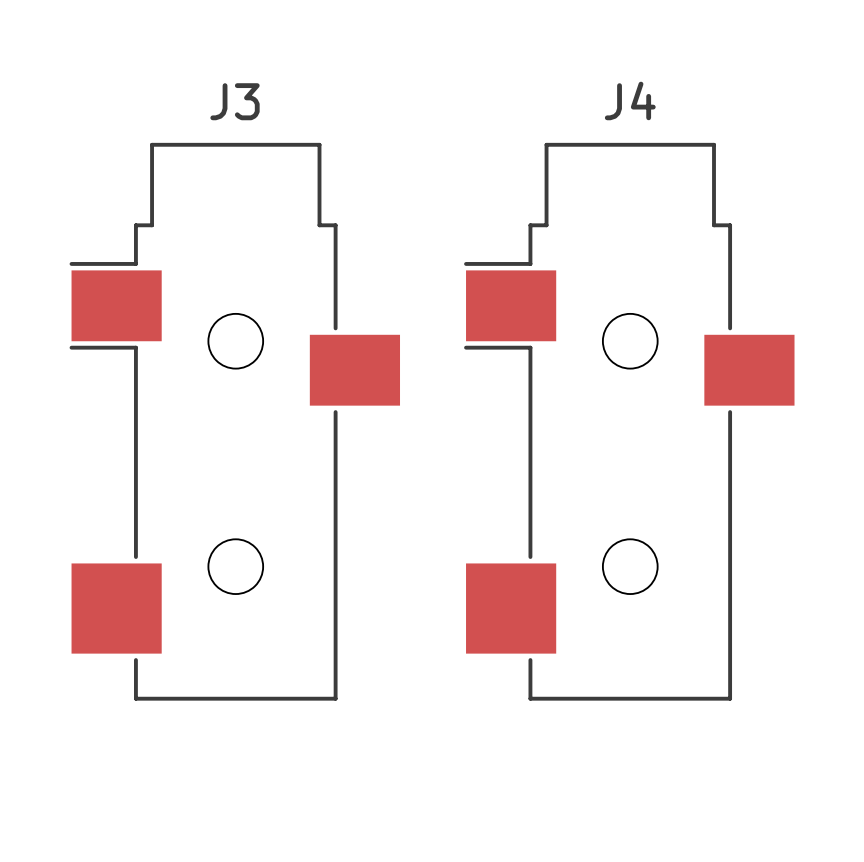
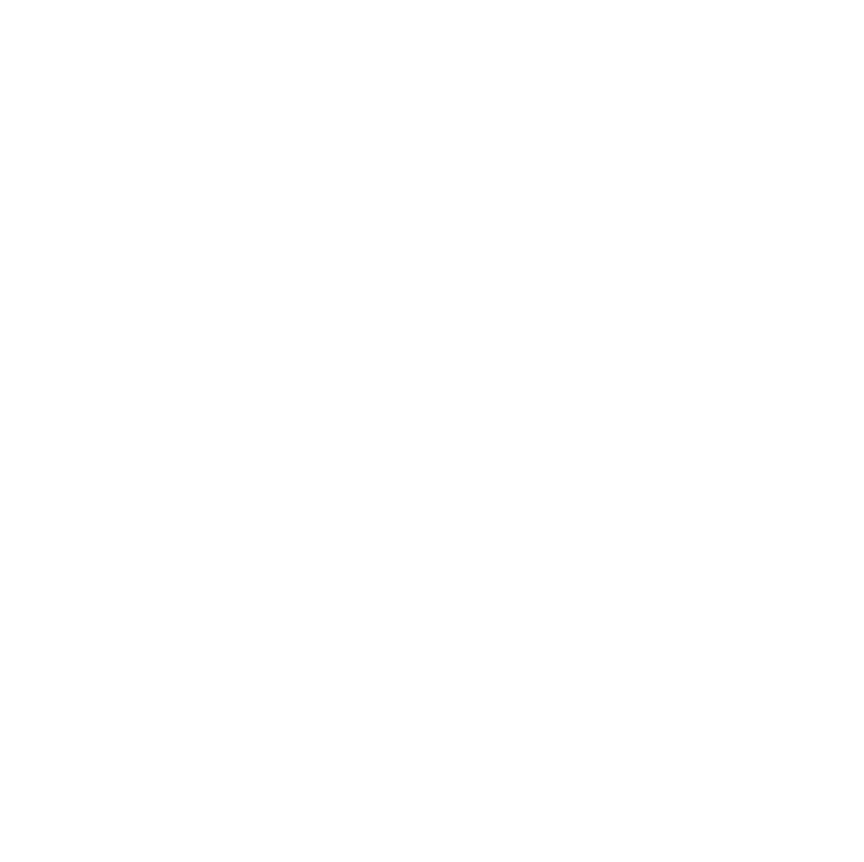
J3: (234, 421) -> none
J4: (629, 421) -> none

